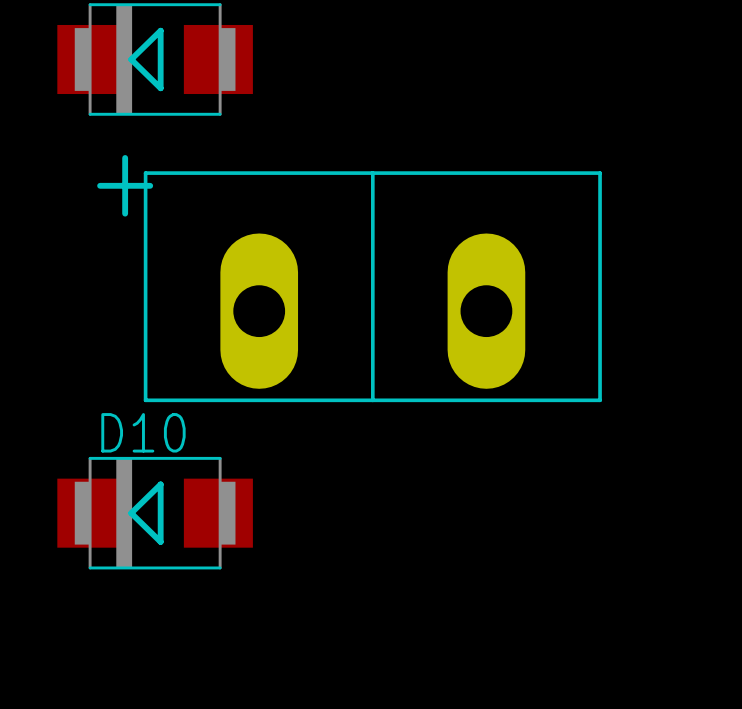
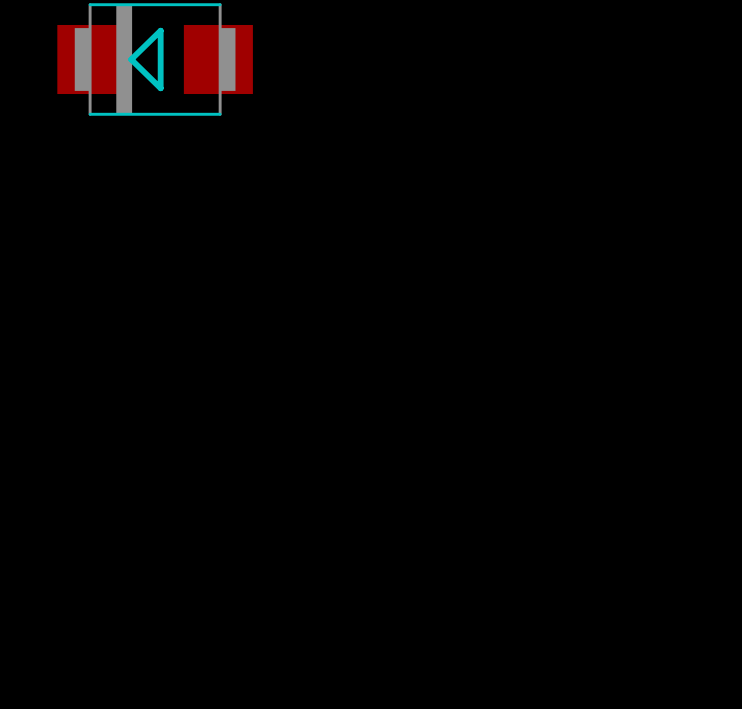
part: (372, 286) -> none
D10: (155, 513) -> none

